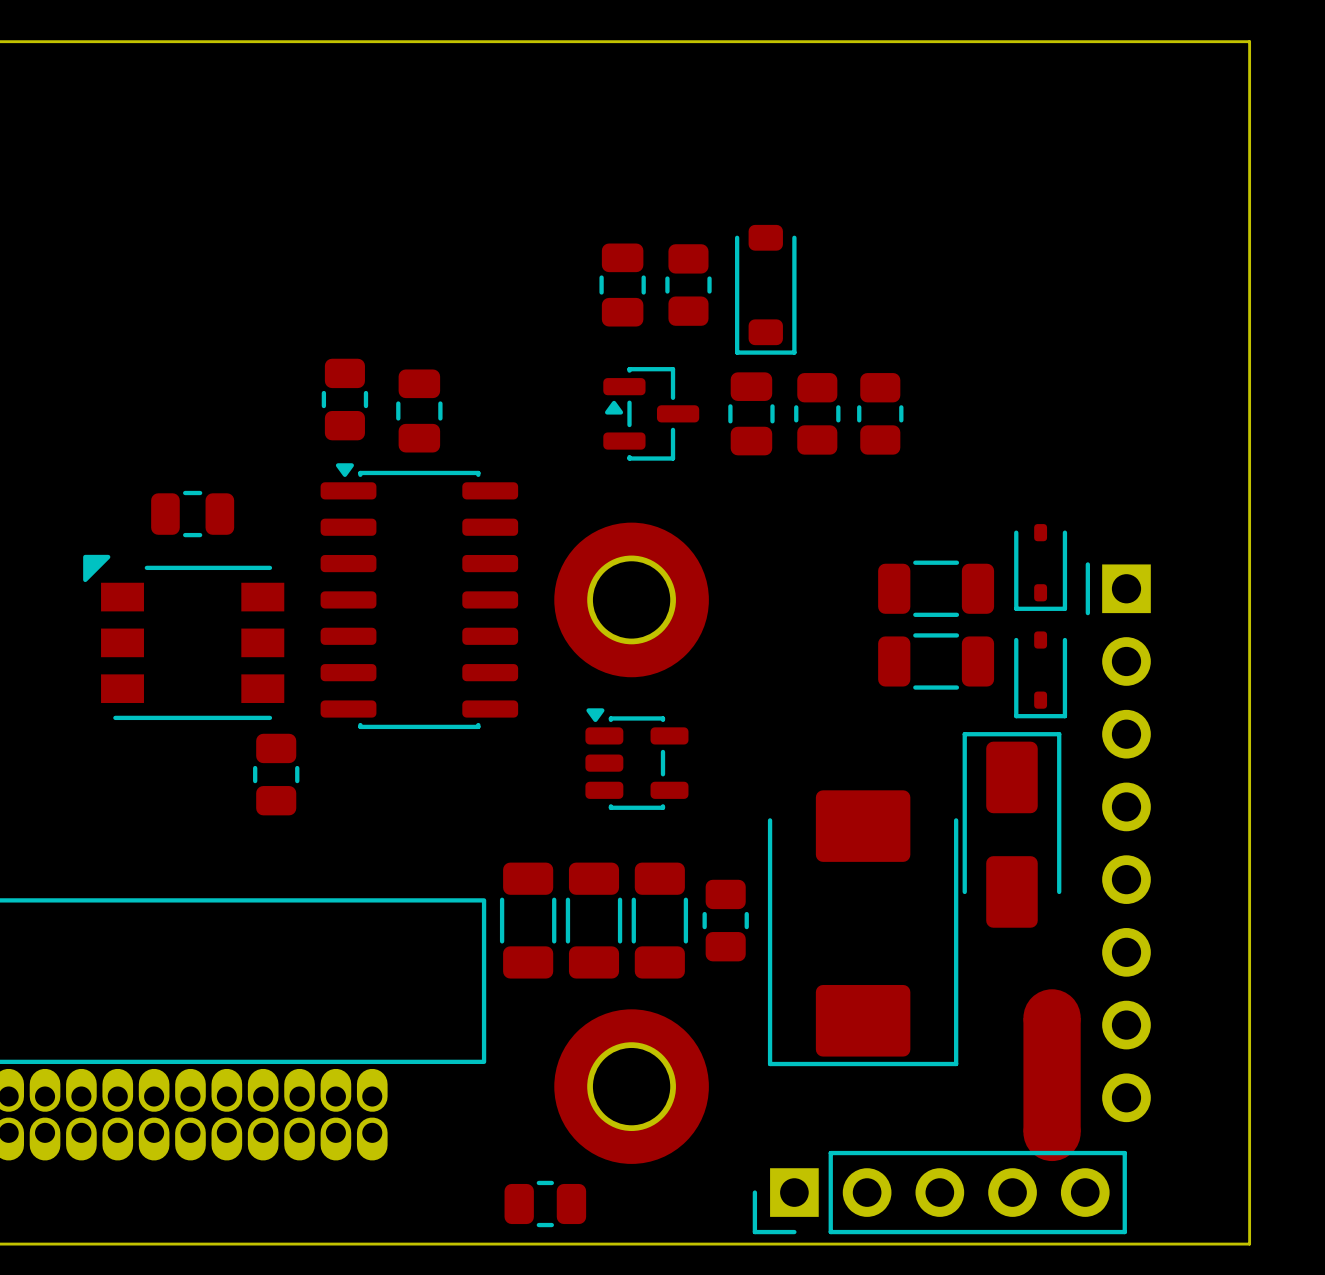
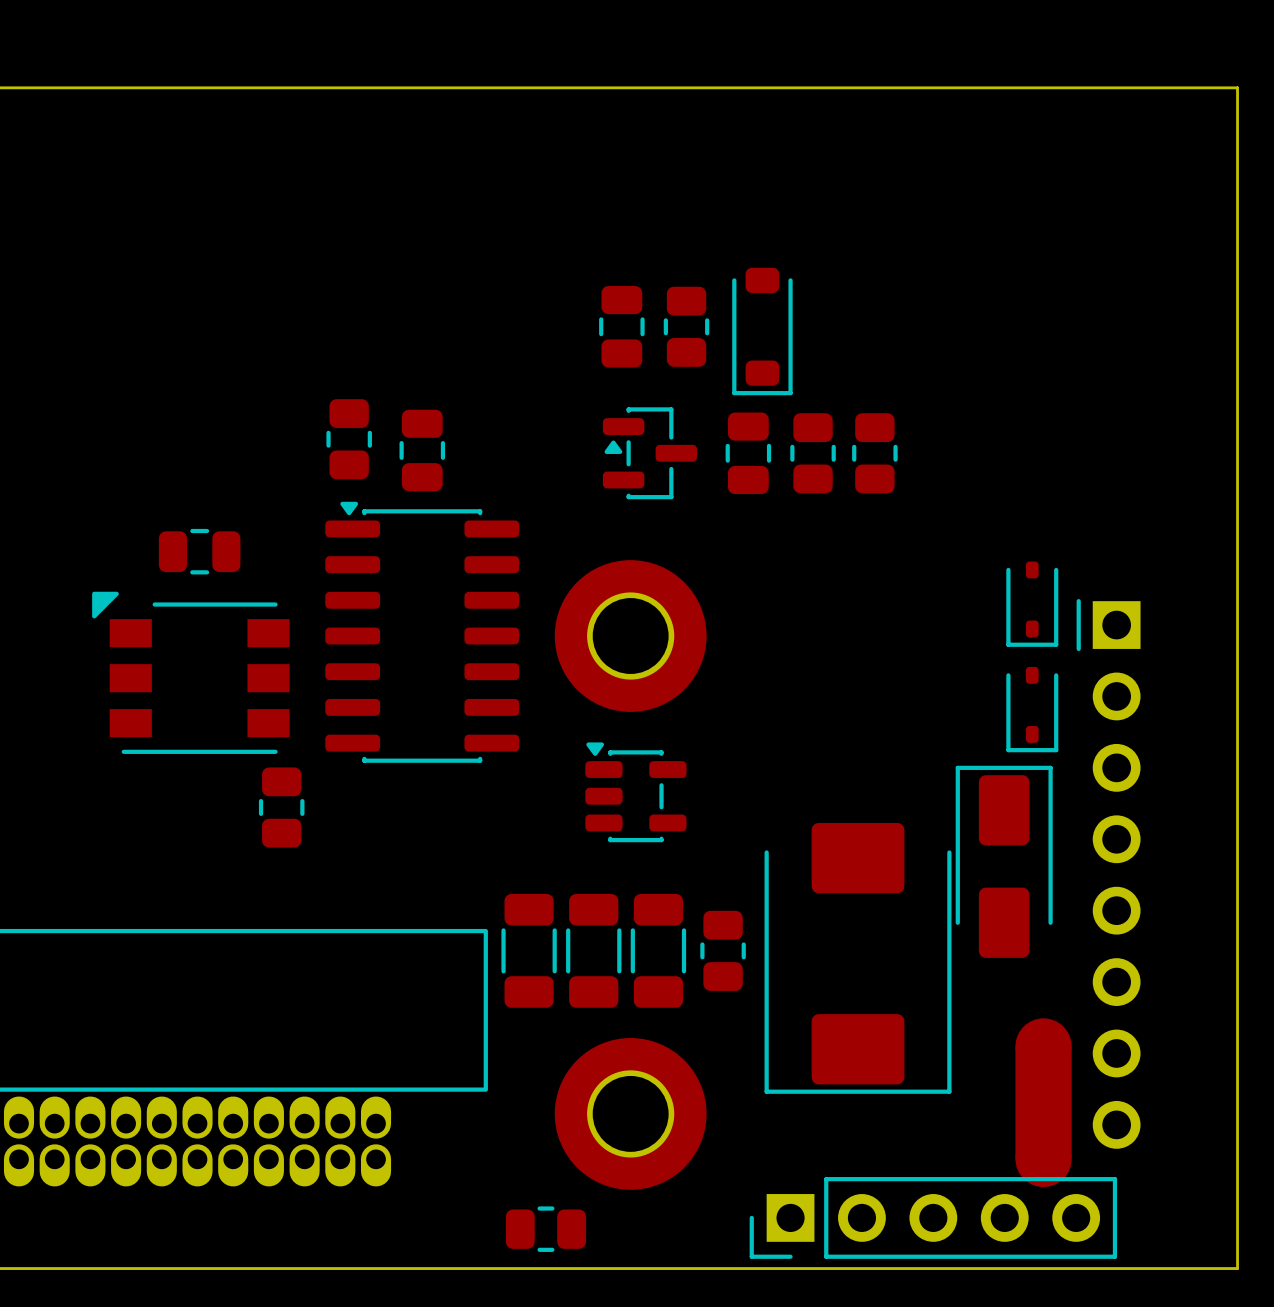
part: (936, 588) -> none
part: (936, 661) -> none

